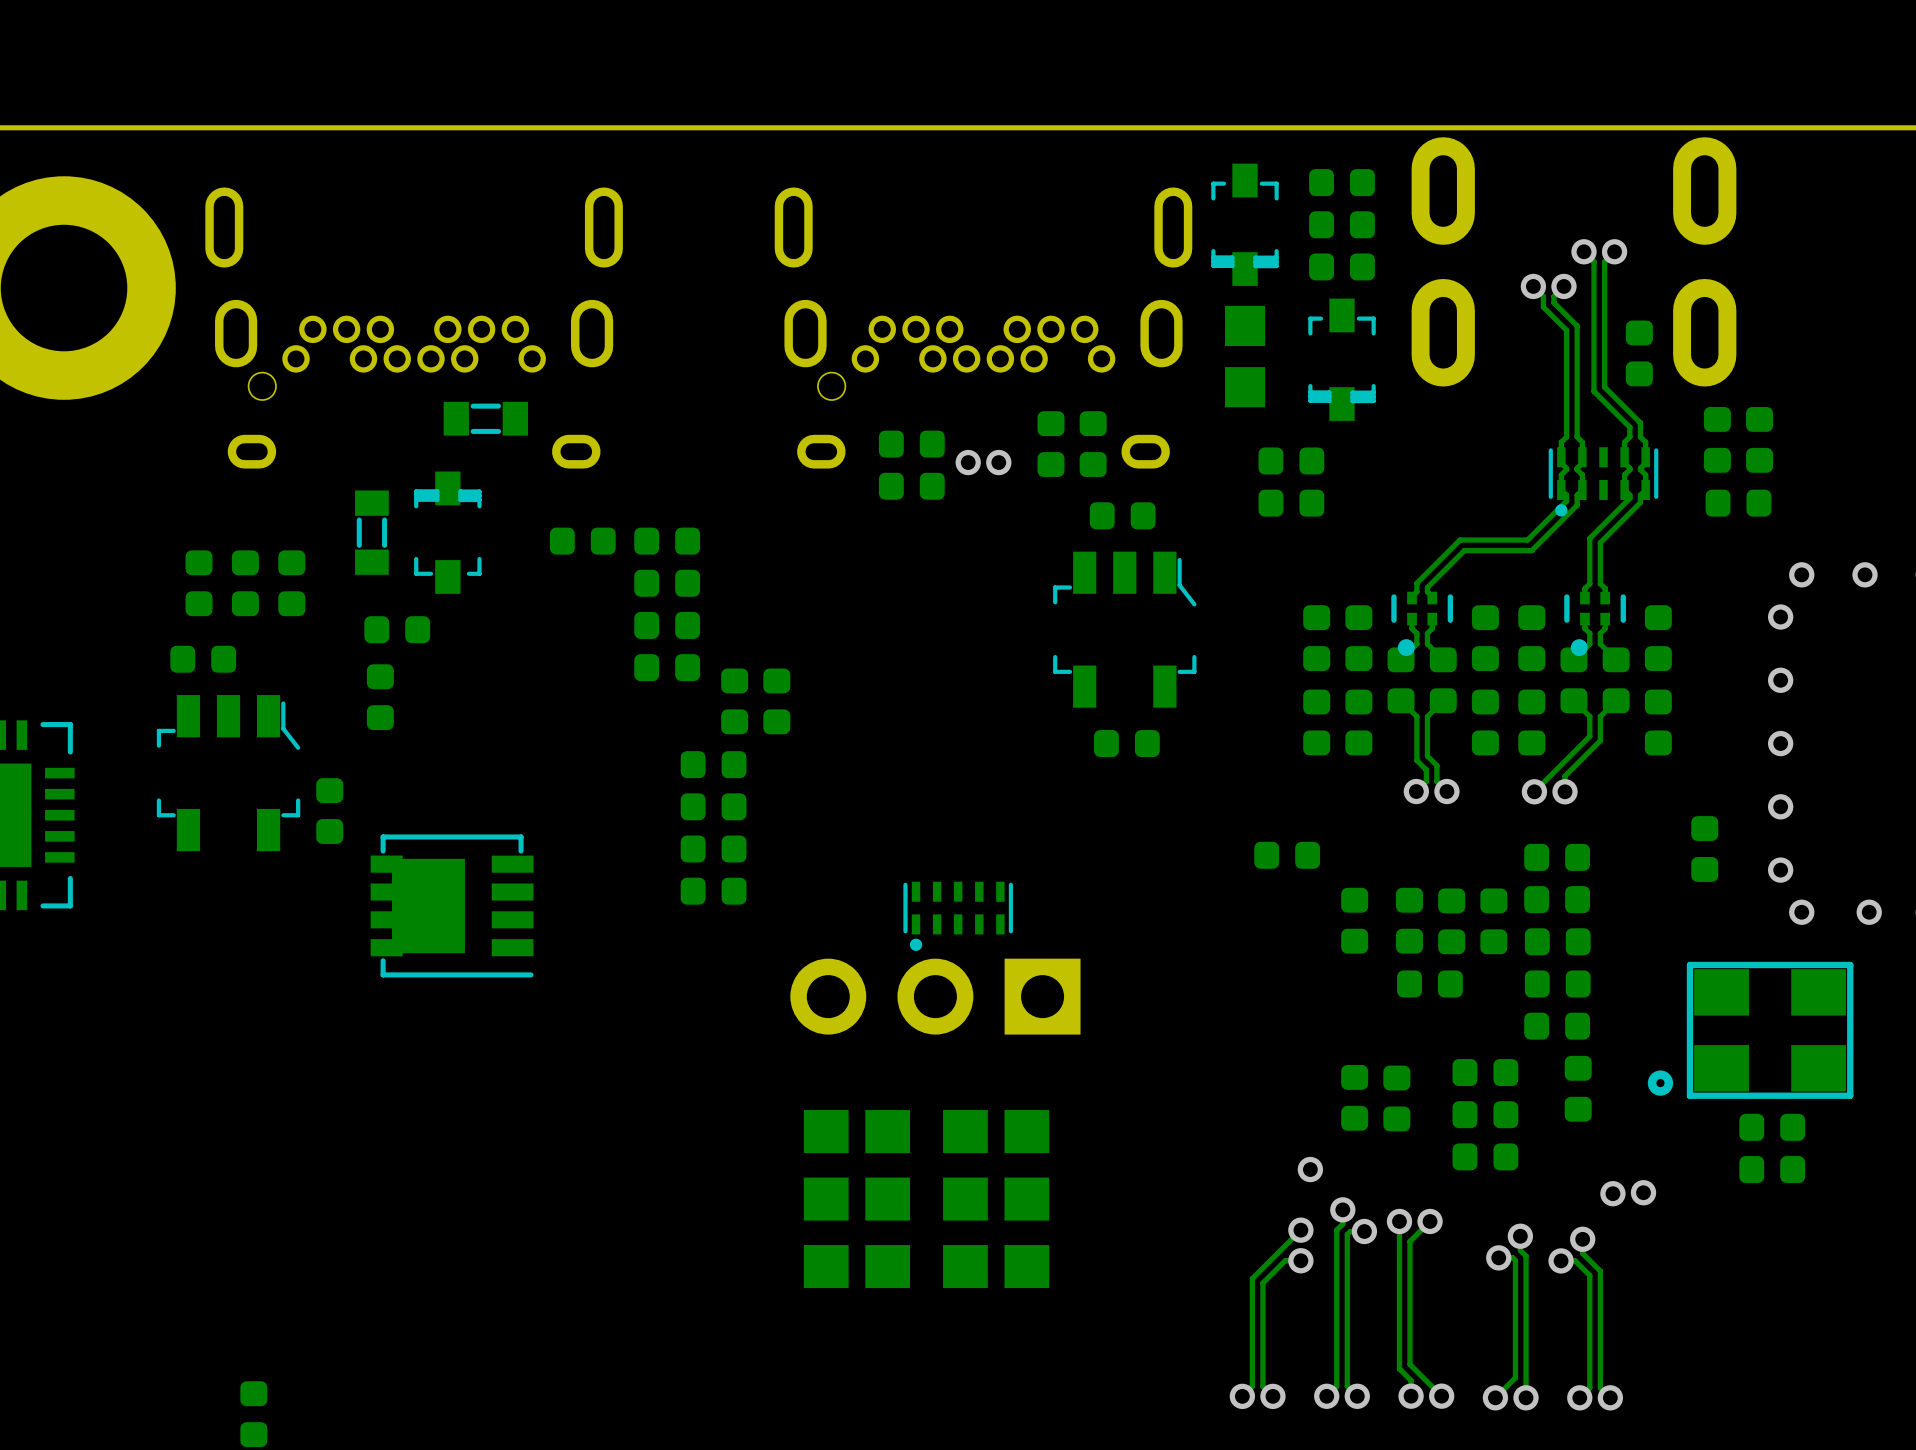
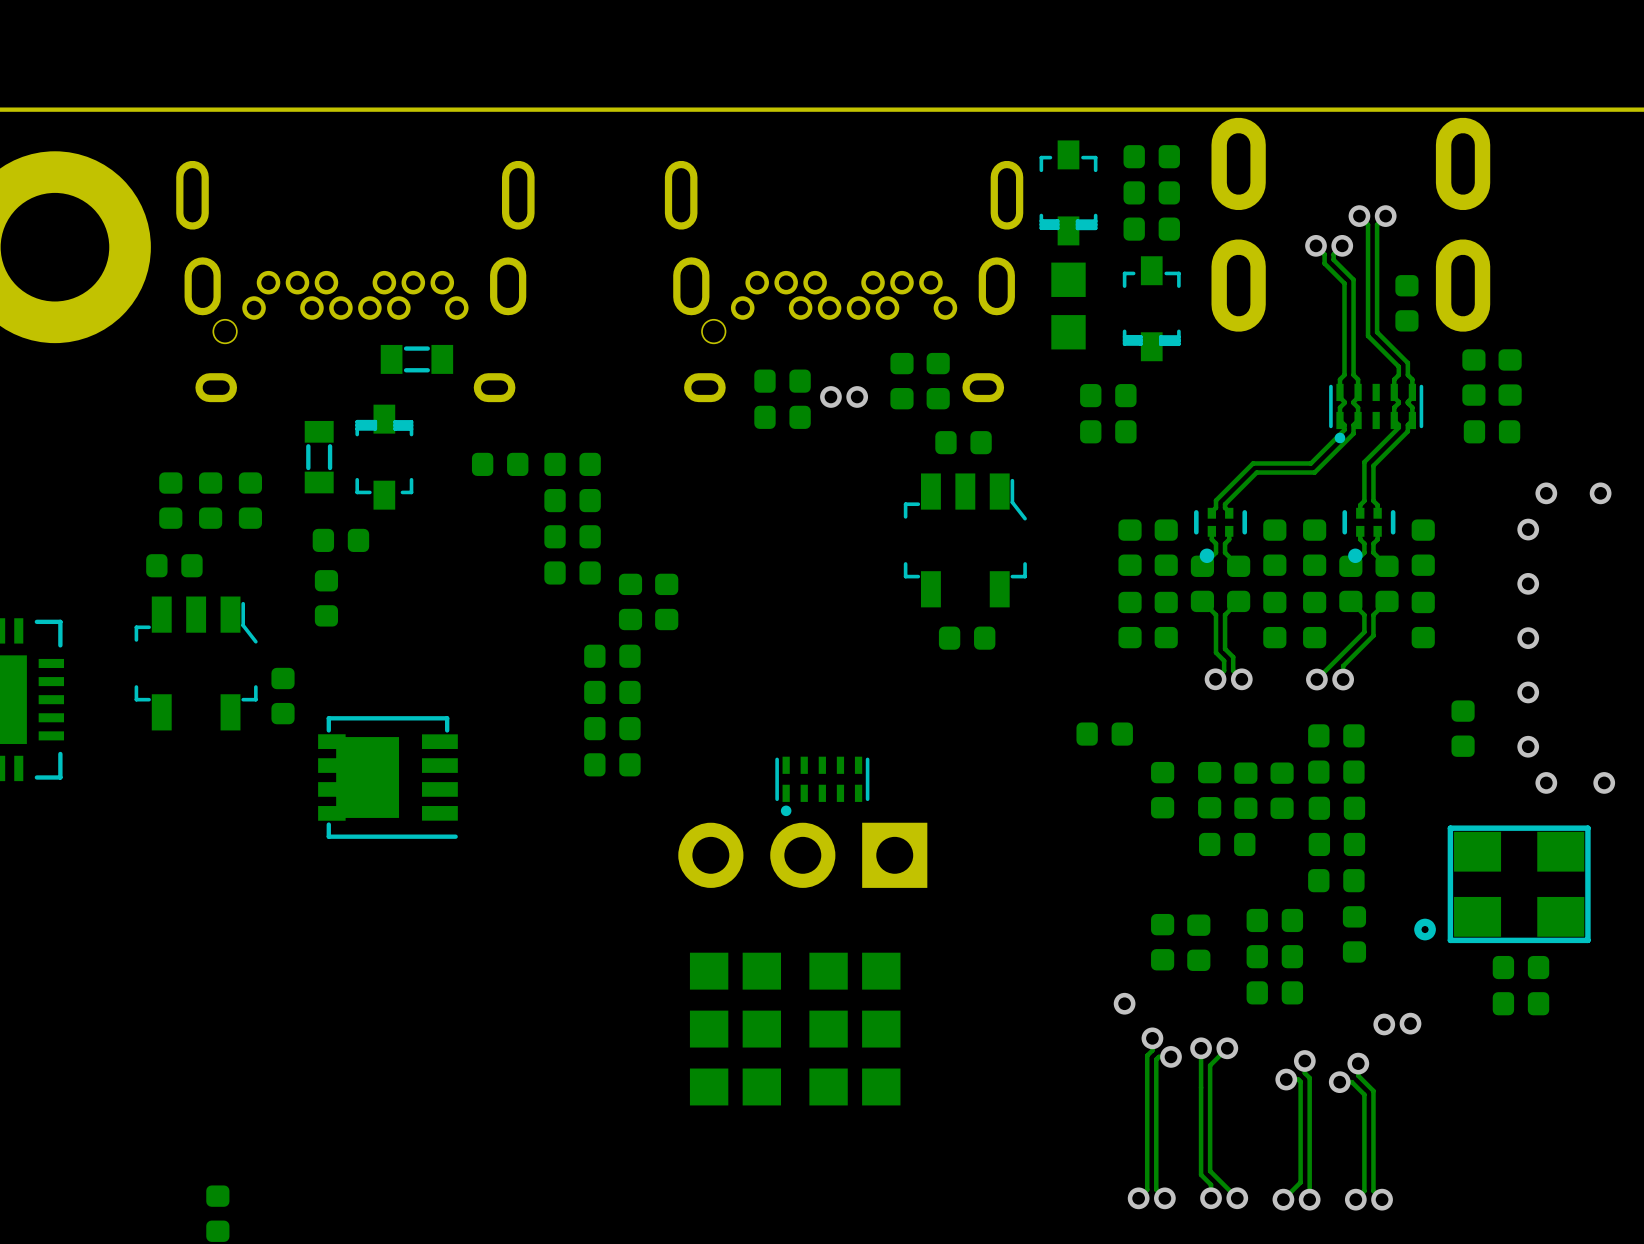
track: (1300, 1230) (1252, 1278) (1252, 1386) (1242, 1396) -> none
via: (1300, 1230) -> none
track: (1300, 1260) (1285, 1260) (1262, 1283) (1262, 1386) (1272, 1396) -> none
via: (1300, 1260) -> none
via: (1242, 1396) -> none
via: (1272, 1396) -> none

